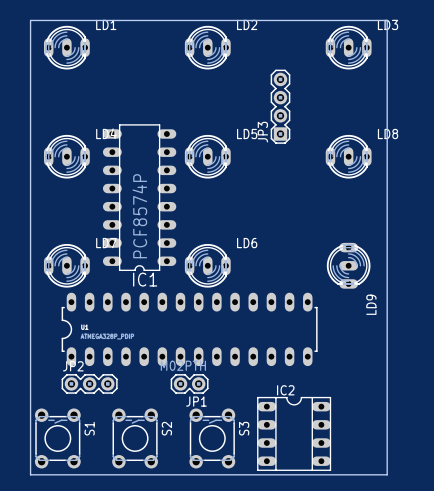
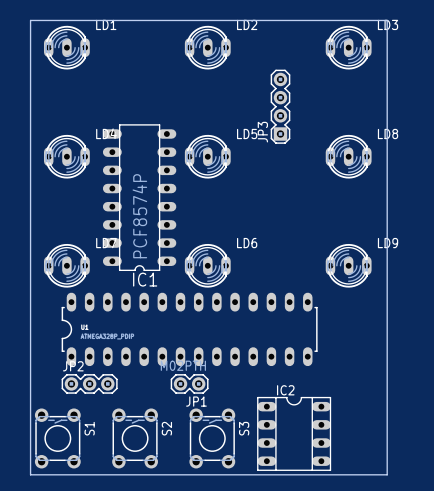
LD9 rotation: 0° (348, 265) -> 90° counterclockwise (348, 265)

